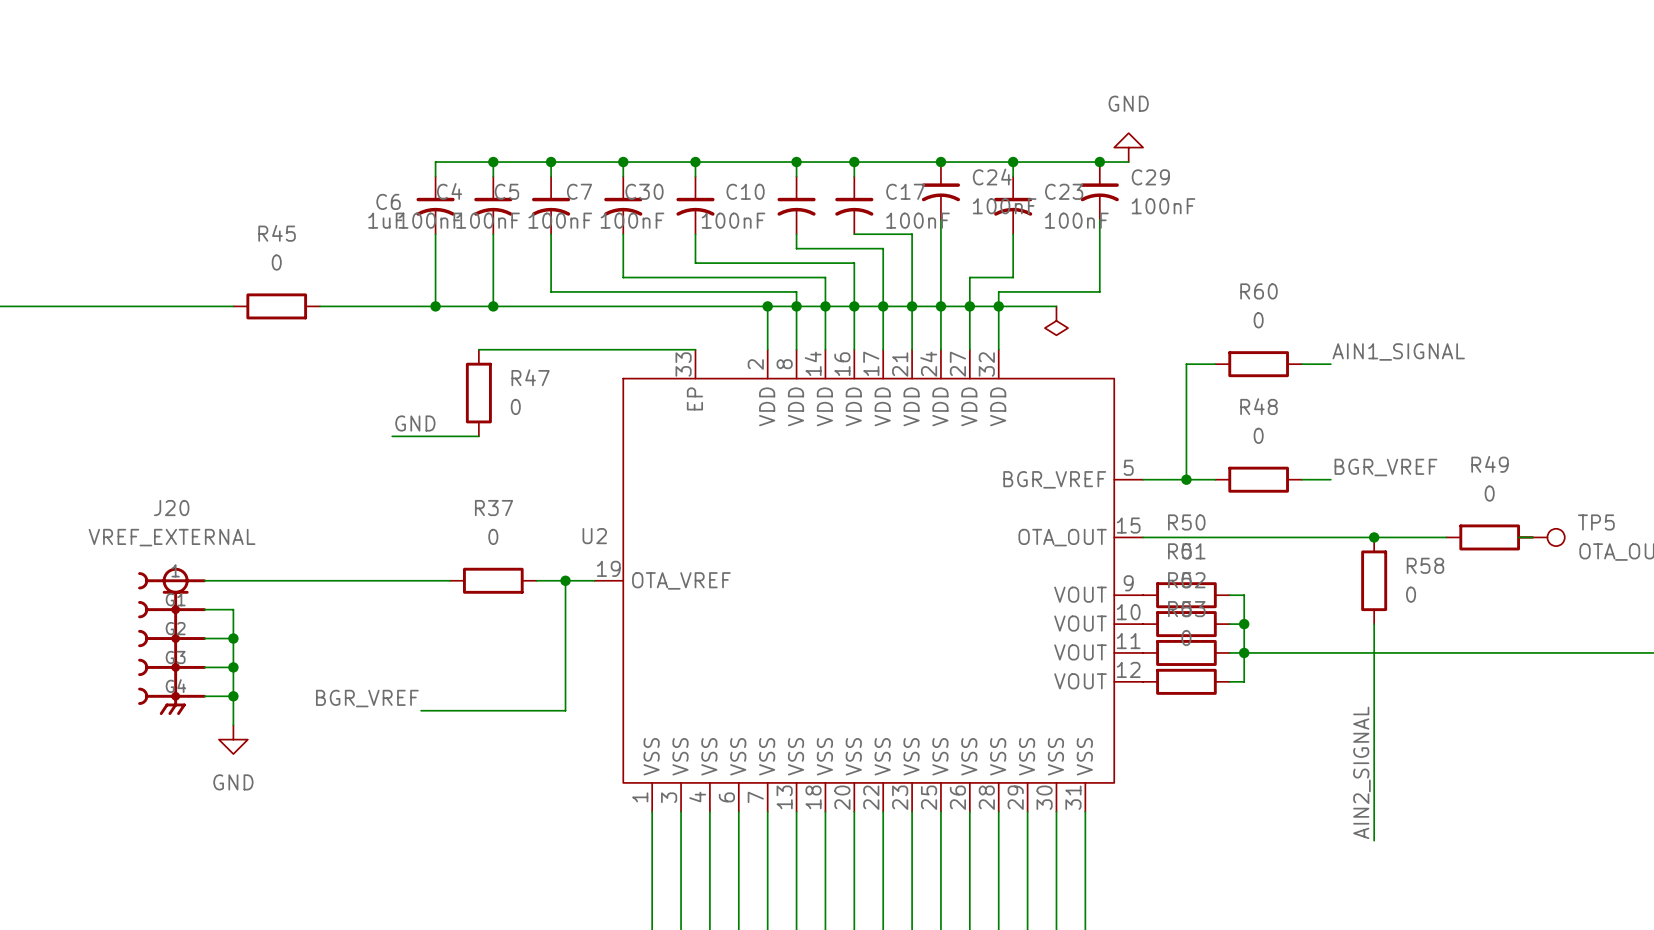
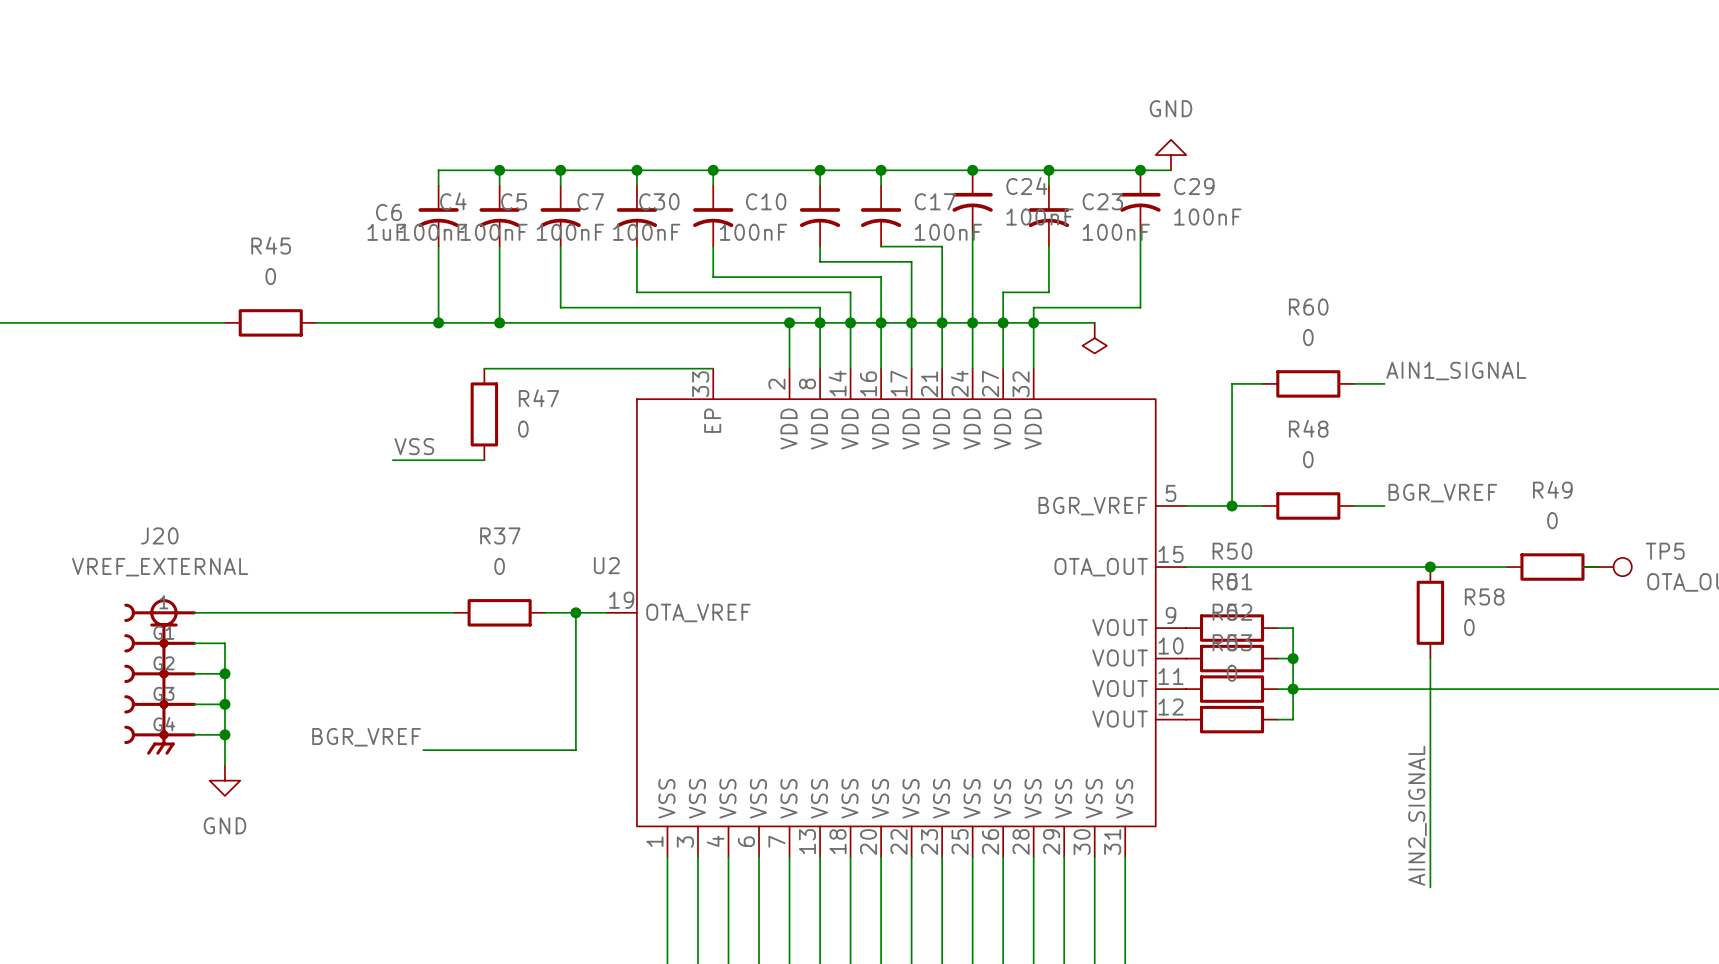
label: GND (415, 423) -> VSS (414, 446)

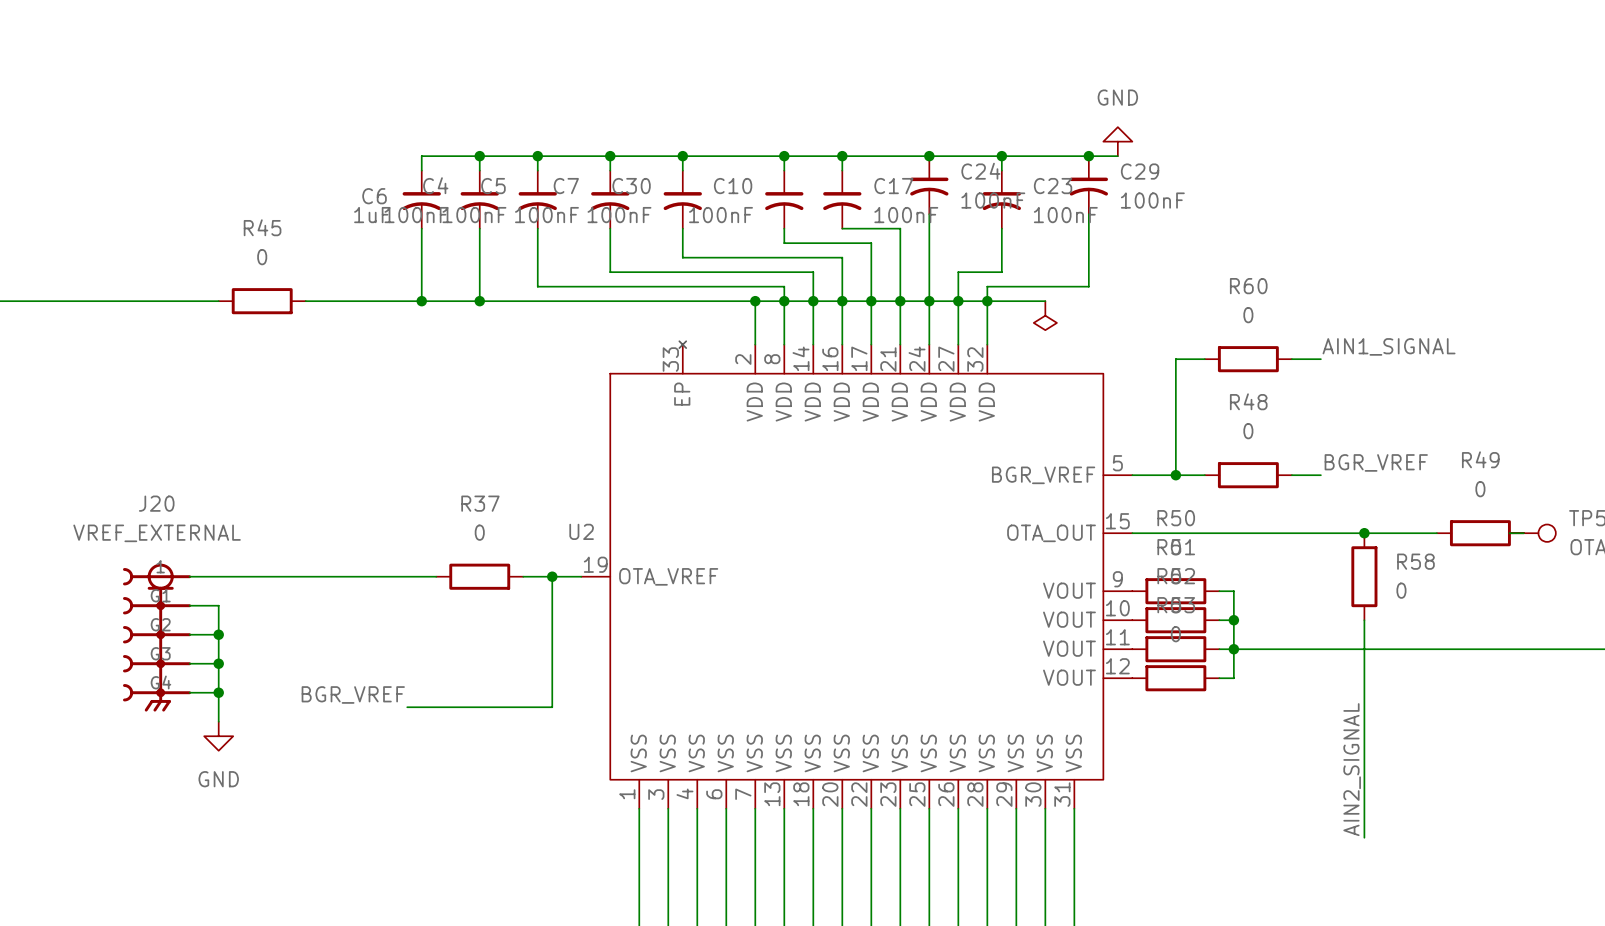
wire: (484, 368) (713, 368) -> none
U2 symbol: [606, 368, 1187, 857] -> [581, 341, 1133, 809]
R47: 0 (484, 414) -> none
label: VSS (414, 446) -> none
wire: (392, 460) (484, 460) -> none

